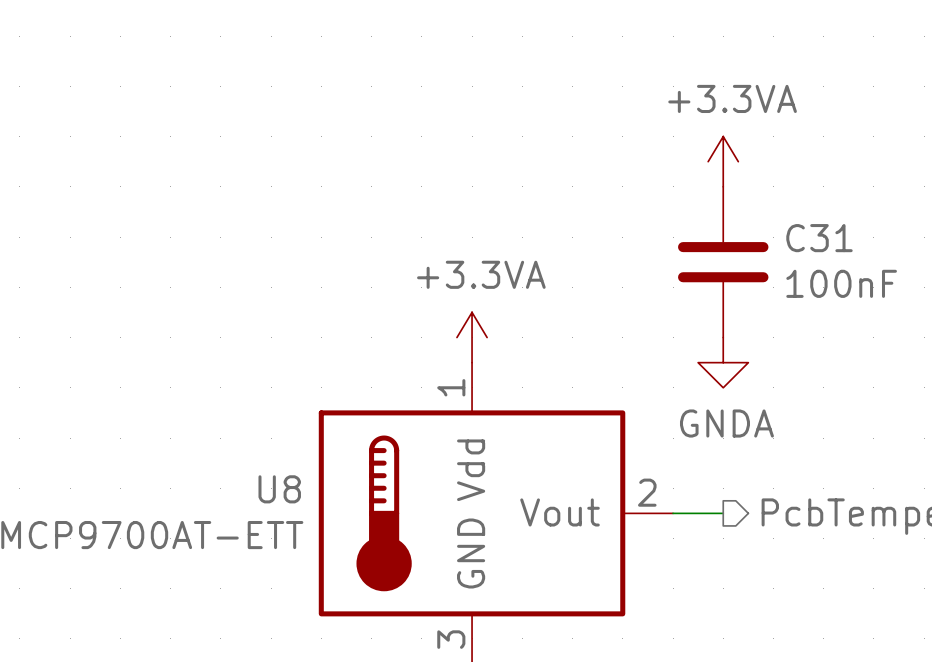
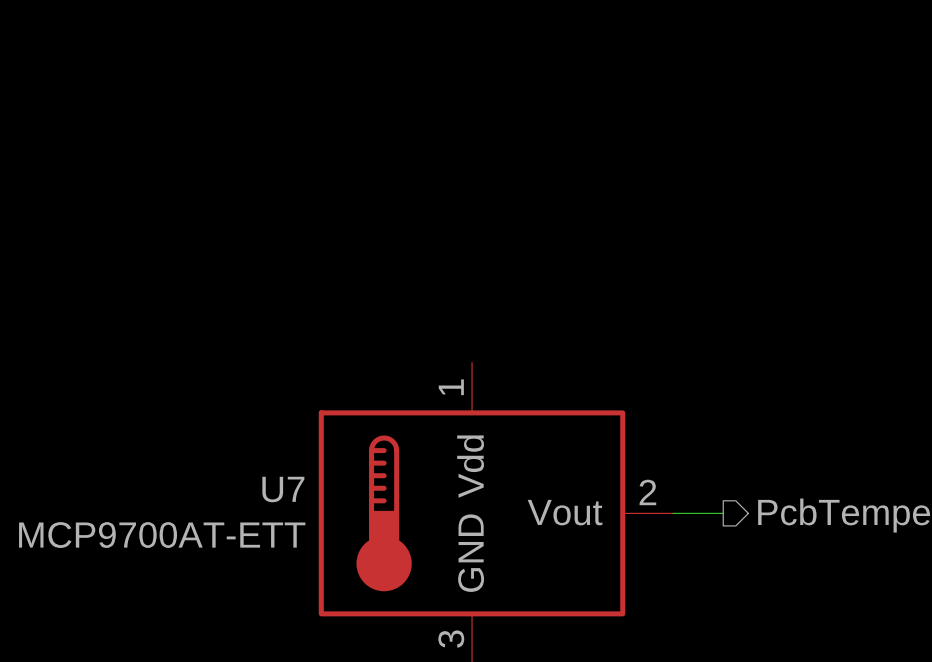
power symbol: +3.3VA (723, 161) -> none
C31: 100nF (723, 262) -> none
power symbol: +3.3VA (472, 337) -> none
power symbol: GNDA (723, 362) -> none
U8 name: U8 (279, 489) -> U7 (283, 489)

